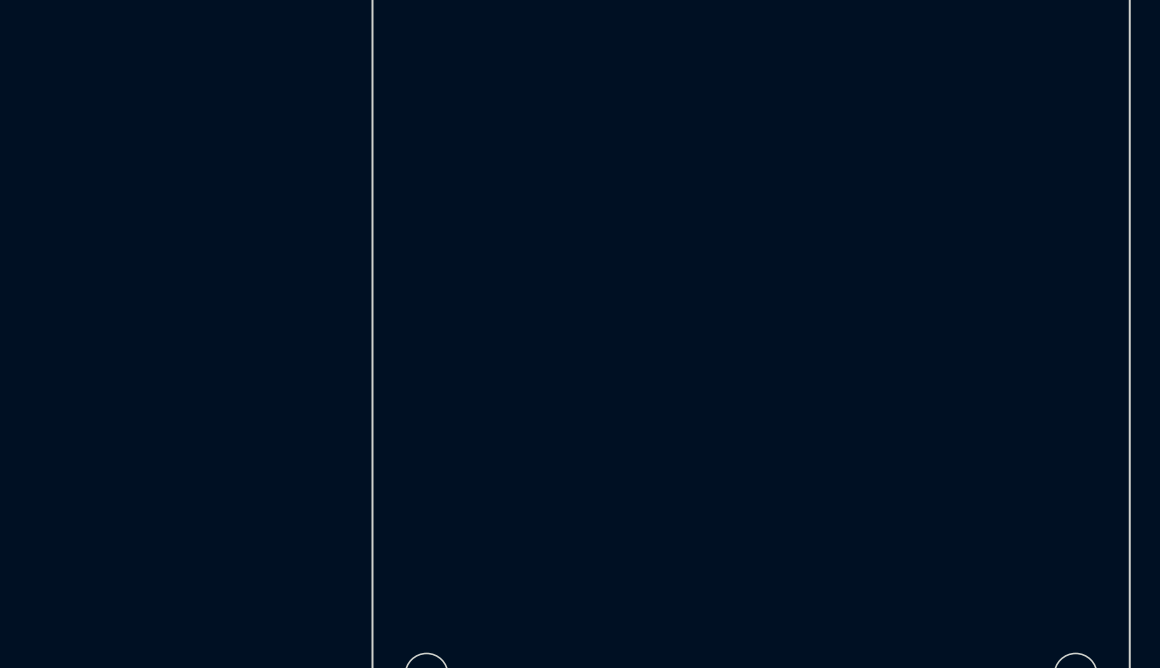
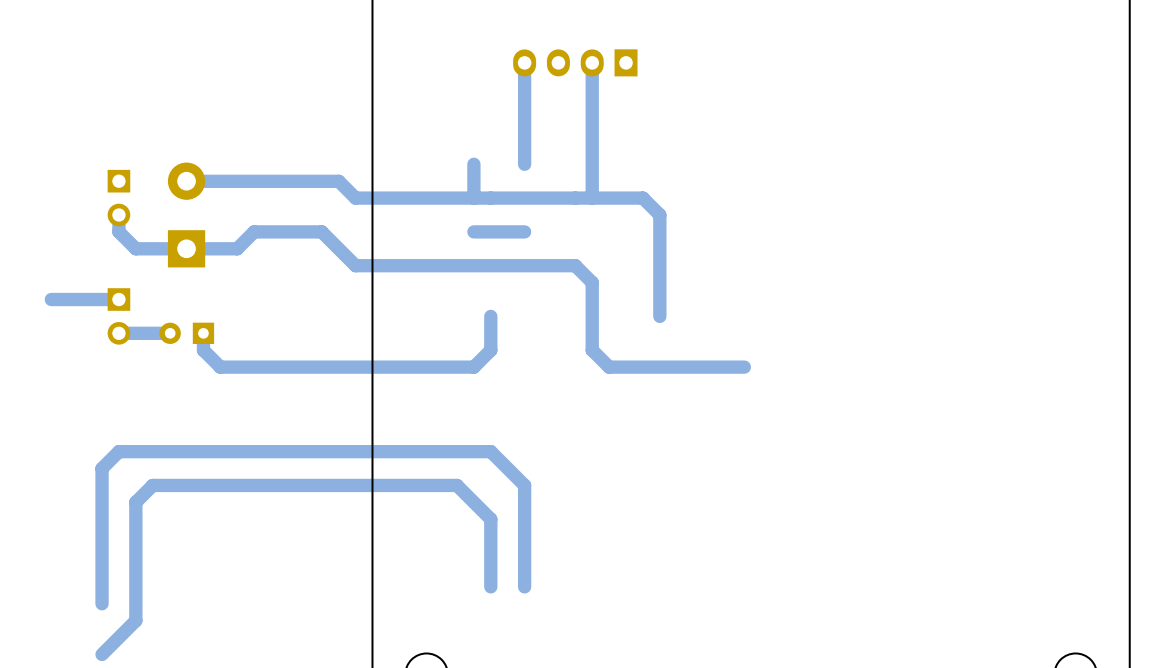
track: none -> (524, 62) (524, 164)
part: none -> (575, 62)
track: none -> (592, 62) (592, 198)
track: none -> (473, 164) (473, 198)
track: none -> (186, 181) (338, 181) (355, 198) (642, 198) (659, 214) (659, 316)
part: none -> (118, 198)
track: none -> (118, 214) (118, 231) (135, 248) (237, 248) (254, 231) (321, 231) (355, 265) (575, 265) (592, 282) (592, 350) (609, 367) (744, 367)
part: none -> (186, 214)
track: none -> (524, 231) (473, 231)
track: none -> (118, 299) (51, 299)
part: none -> (118, 316)
track: none -> (490, 316) (490, 350) (473, 367) (220, 367) (203, 350) (203, 333)
track: none -> (170, 333) (118, 333)
part: none -> (186, 333)
track: none -> (490, 586) (490, 519) (457, 485) (152, 485) (135, 502) (135, 620) (102, 654)
track: none -> (524, 586) (524, 485) (490, 451) (118, 451) (102, 468) (102, 603)

